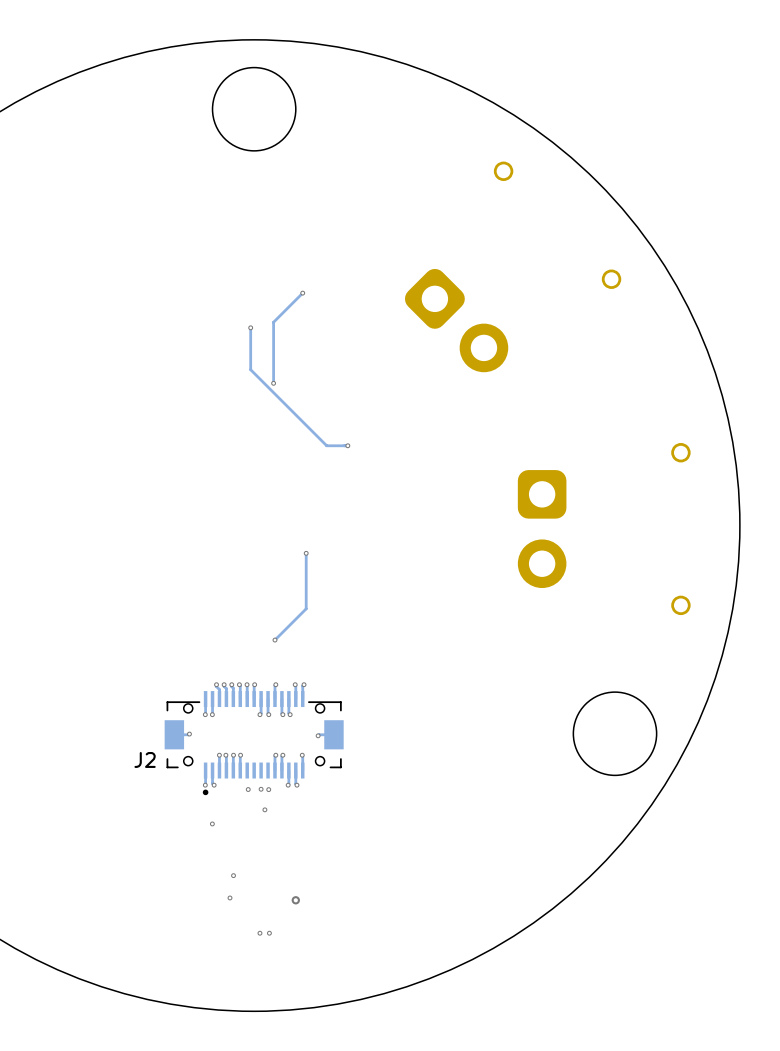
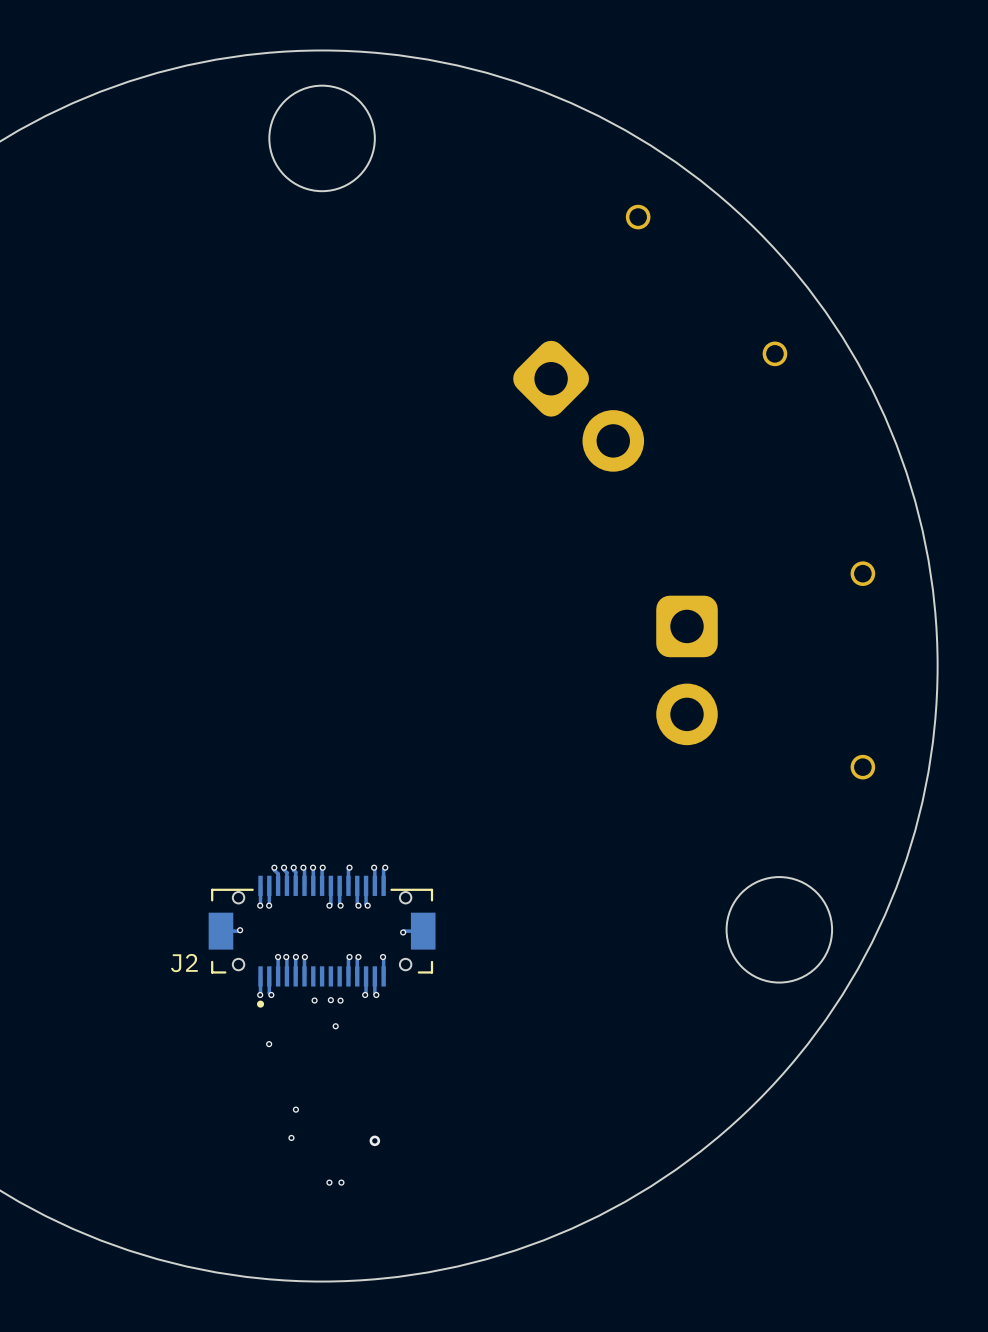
track: (302, 293) (273, 322) (273, 383) -> none
via: (302, 293) -> none
track: (250, 327) (250, 369) (326, 445) (347, 445) -> none
via: (250, 327) -> none
via: (273, 383) -> none
via: (347, 445) -> none
track: (306, 553) (306, 608) (274, 640) -> none
via: (306, 553) -> none
via: (274, 640) -> none

